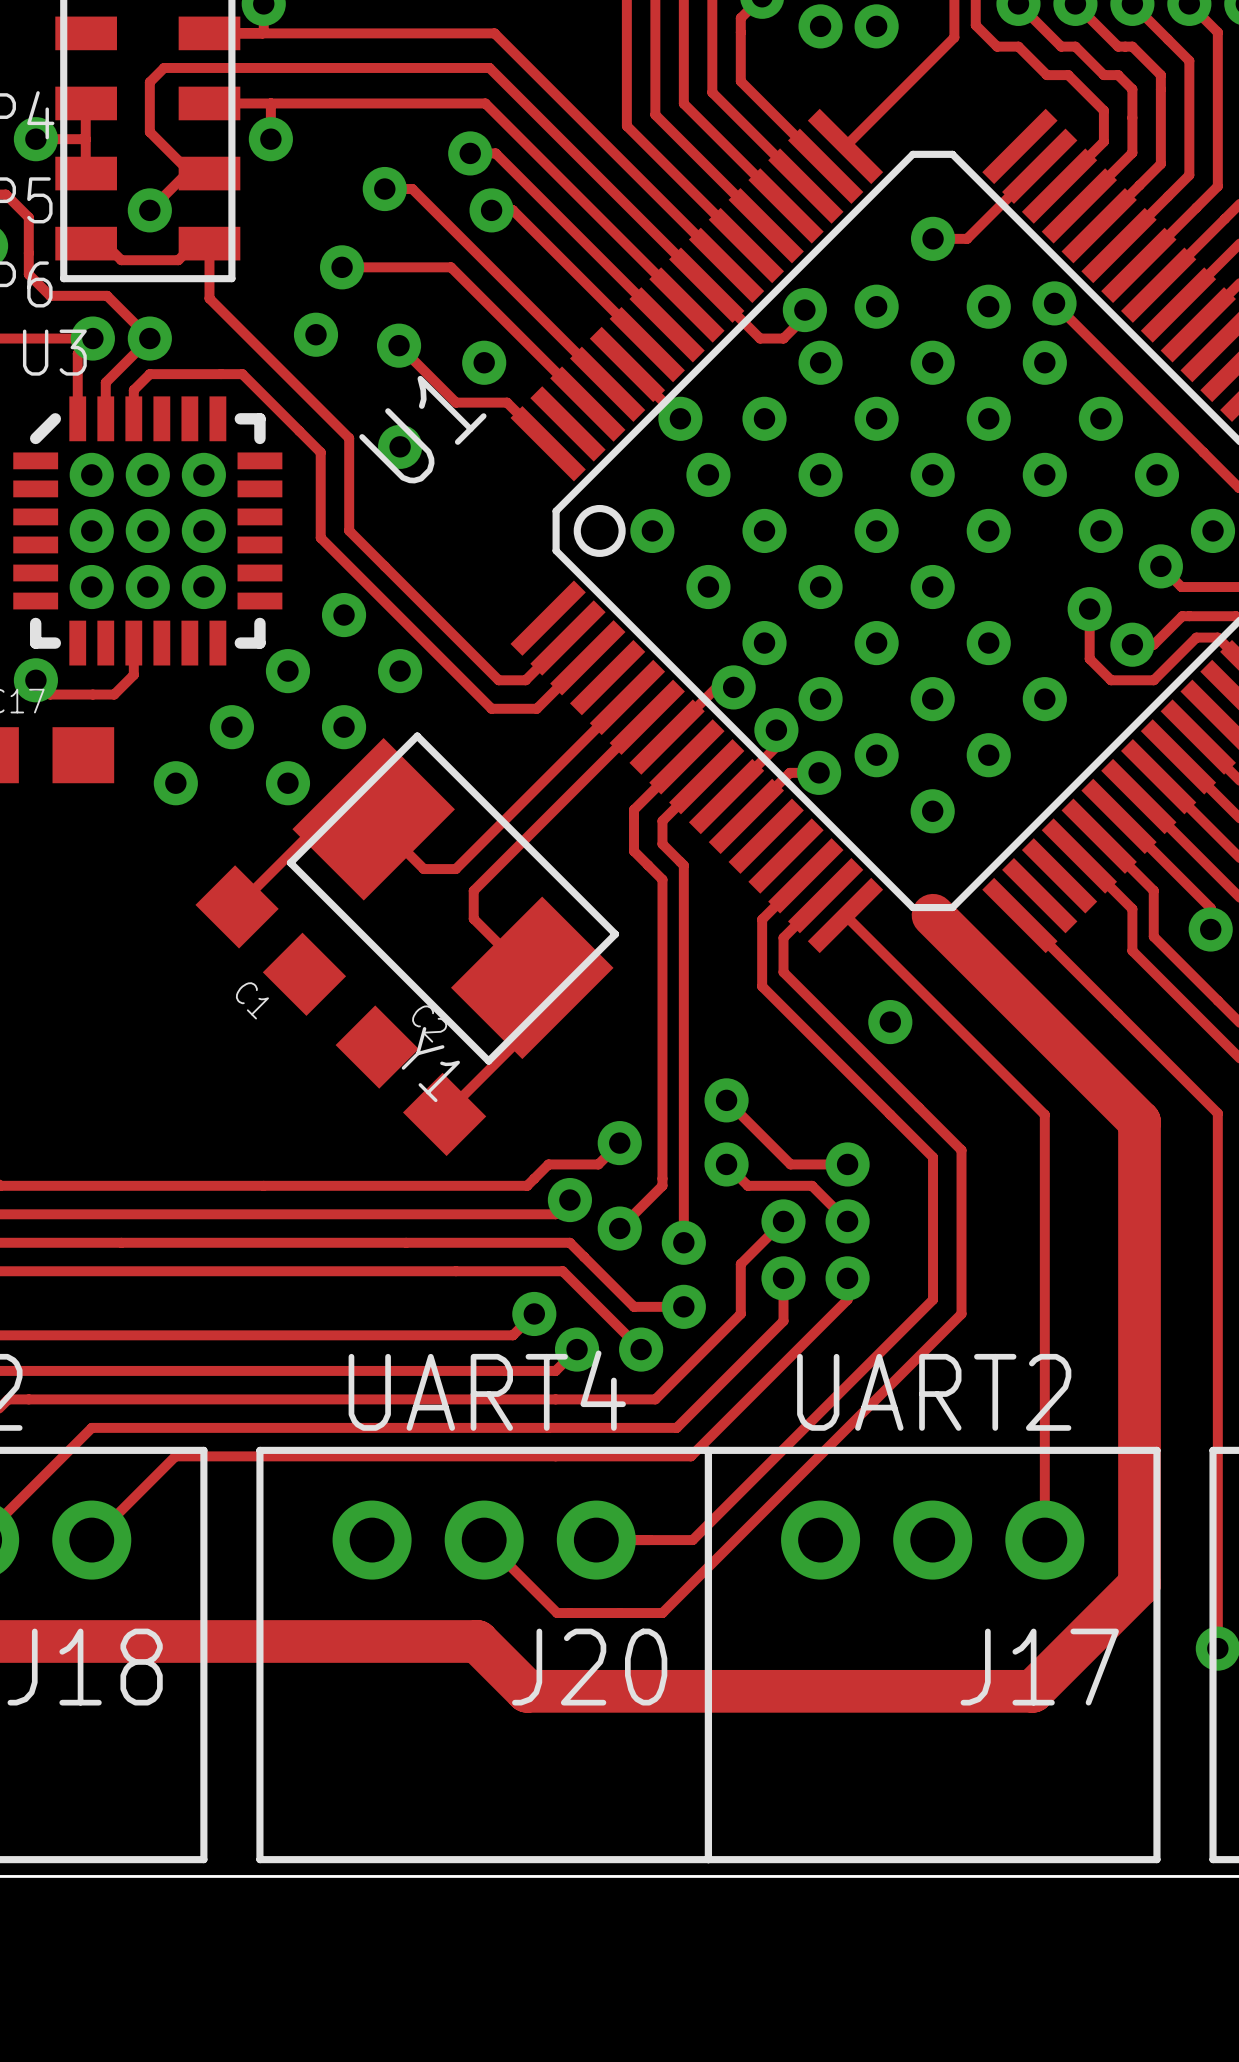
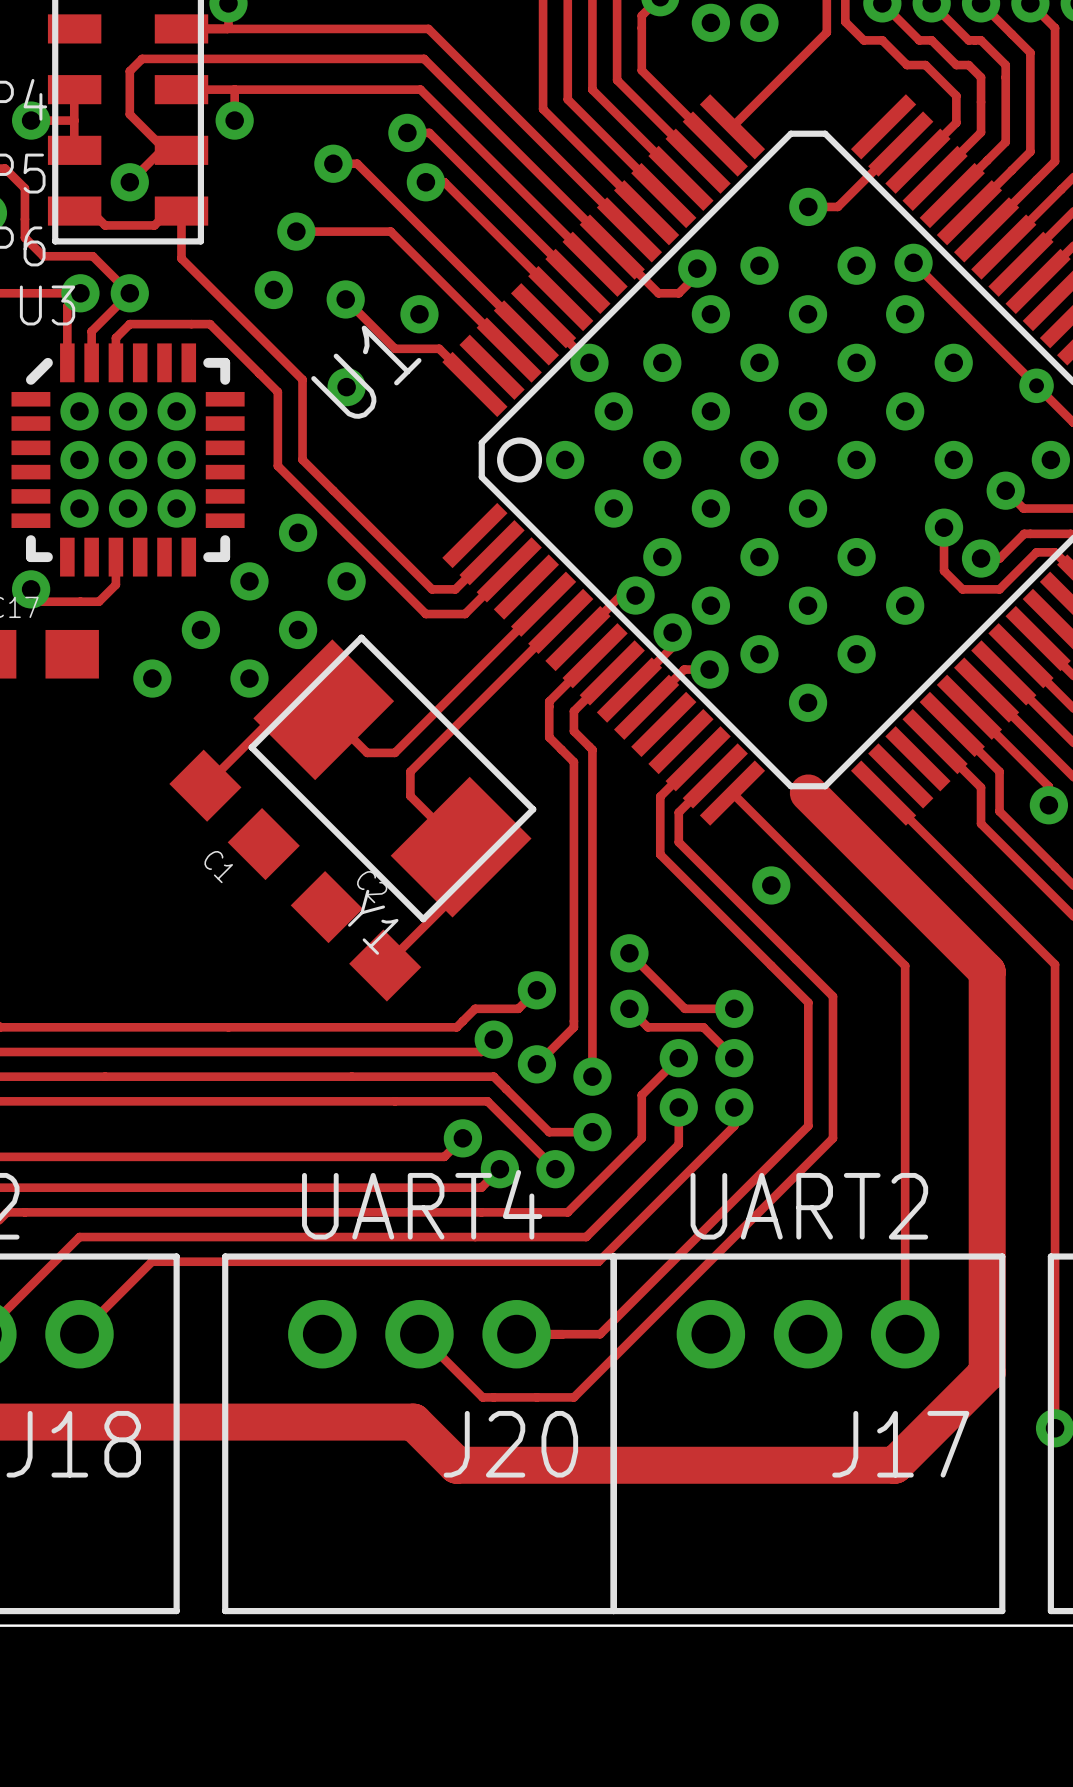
via position: (1156, 474) -> (1036, 385)

